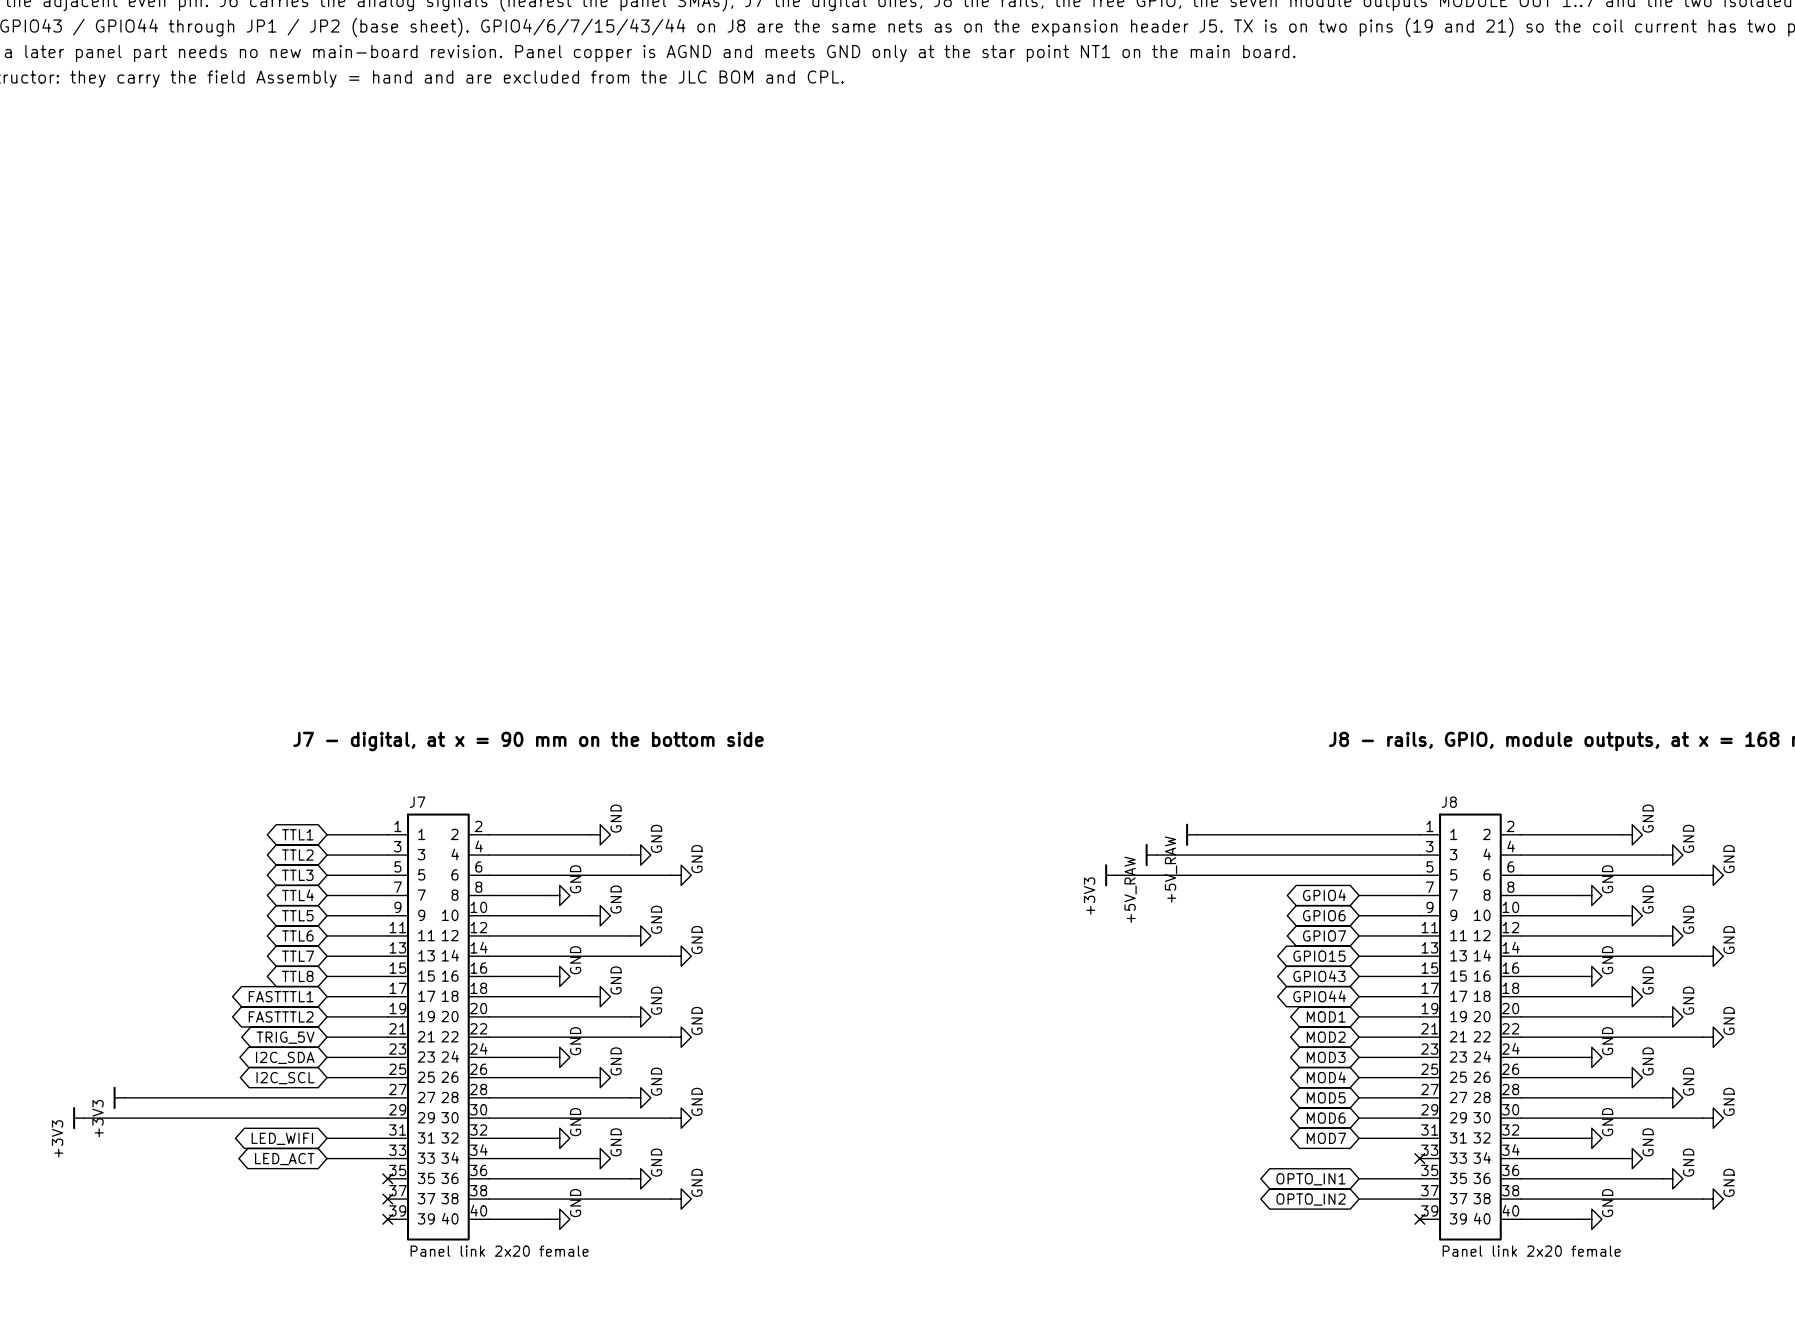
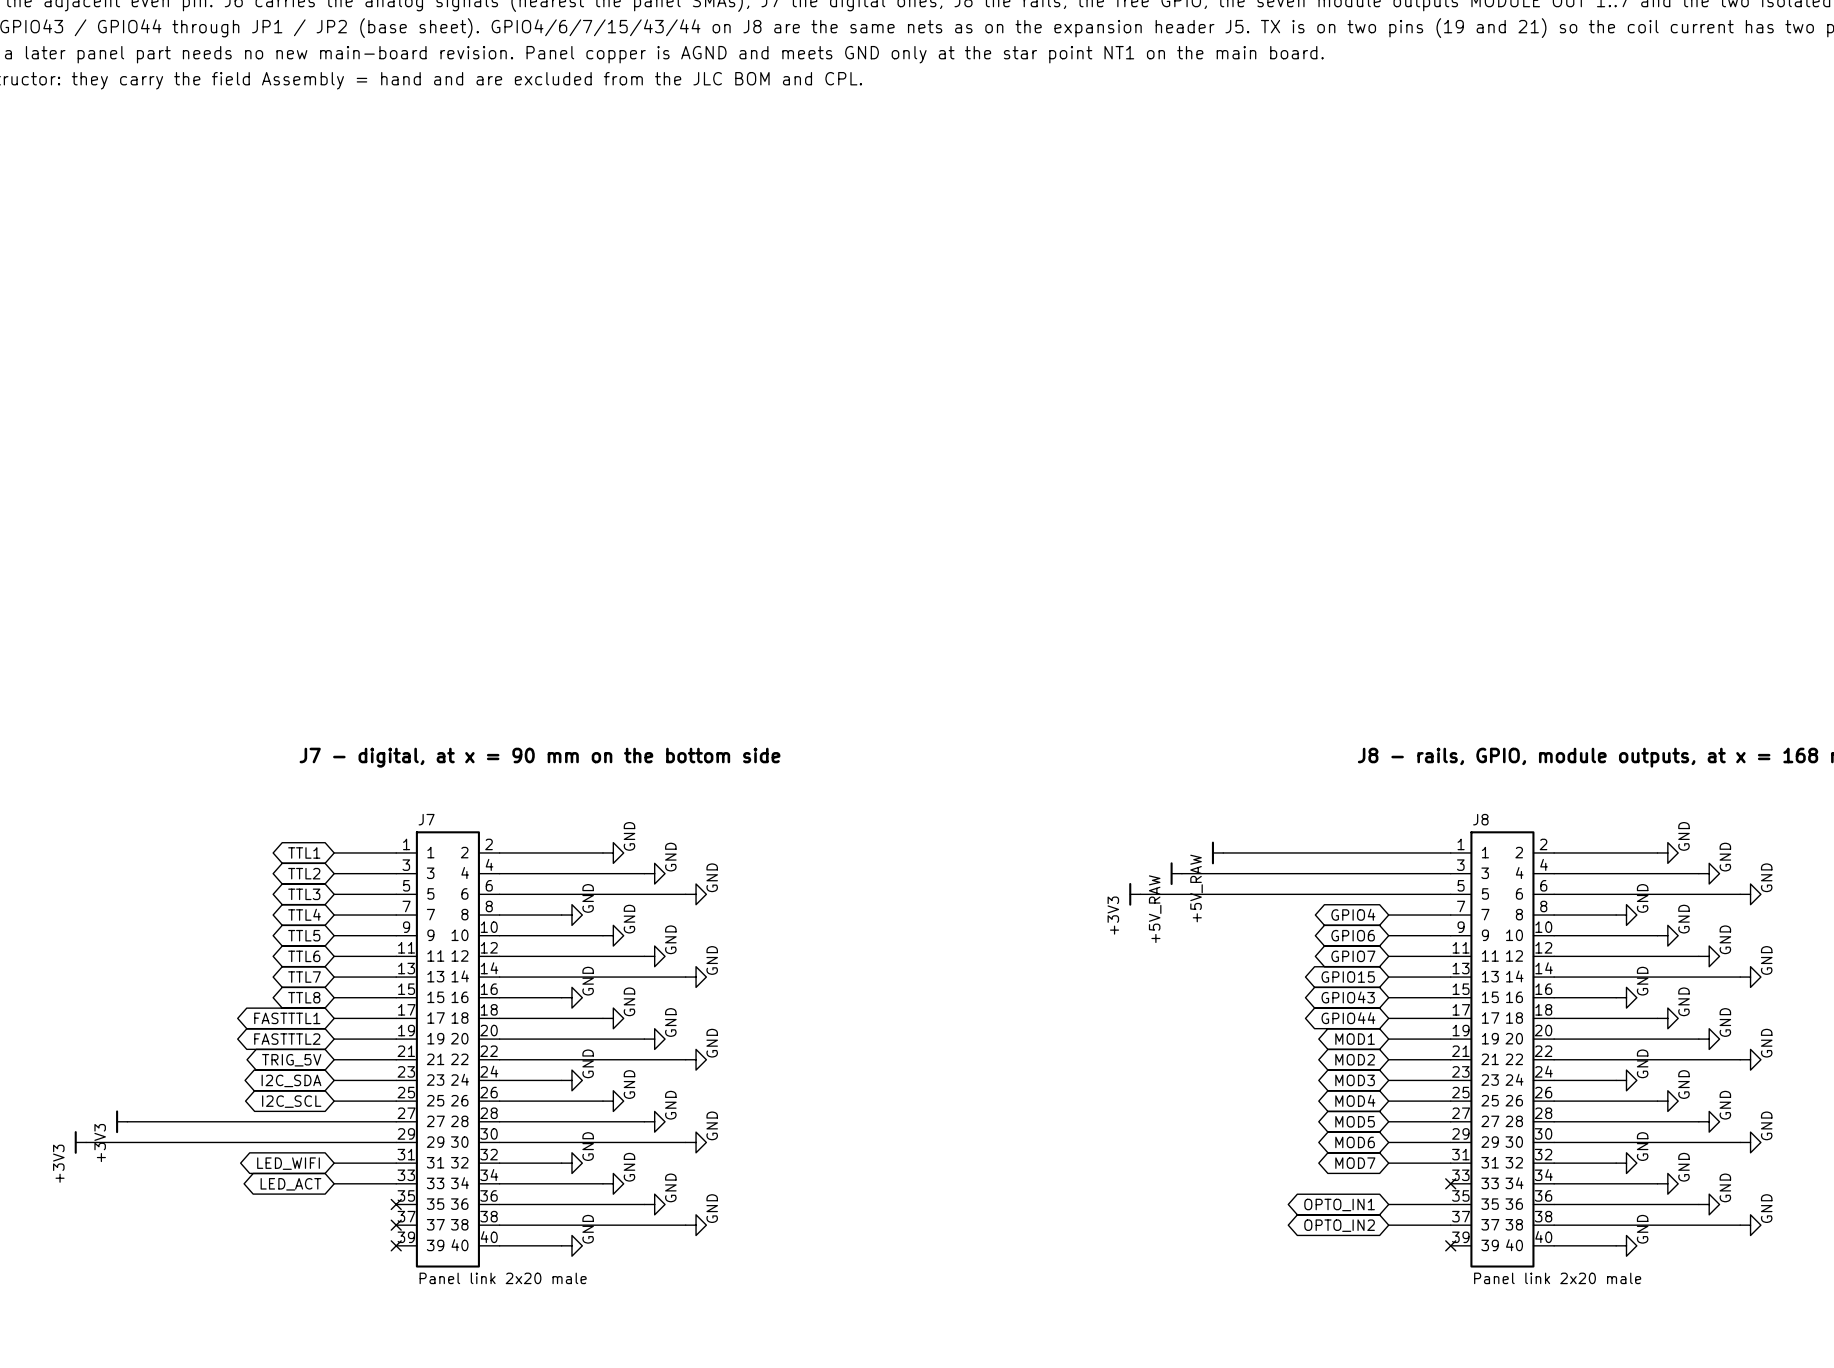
J7 value: Panel link 2x20 female (499, 1251) -> Panel link 2x20 male (503, 1278)
J8 value: Panel link 2x20 female (1531, 1251) -> Panel link 2x20 male (1557, 1278)

